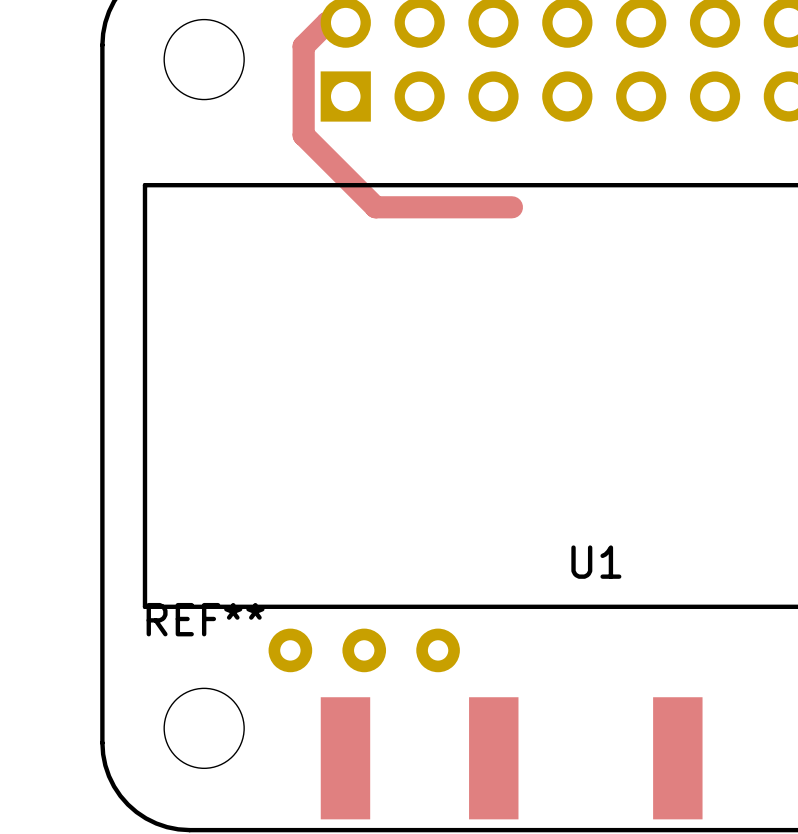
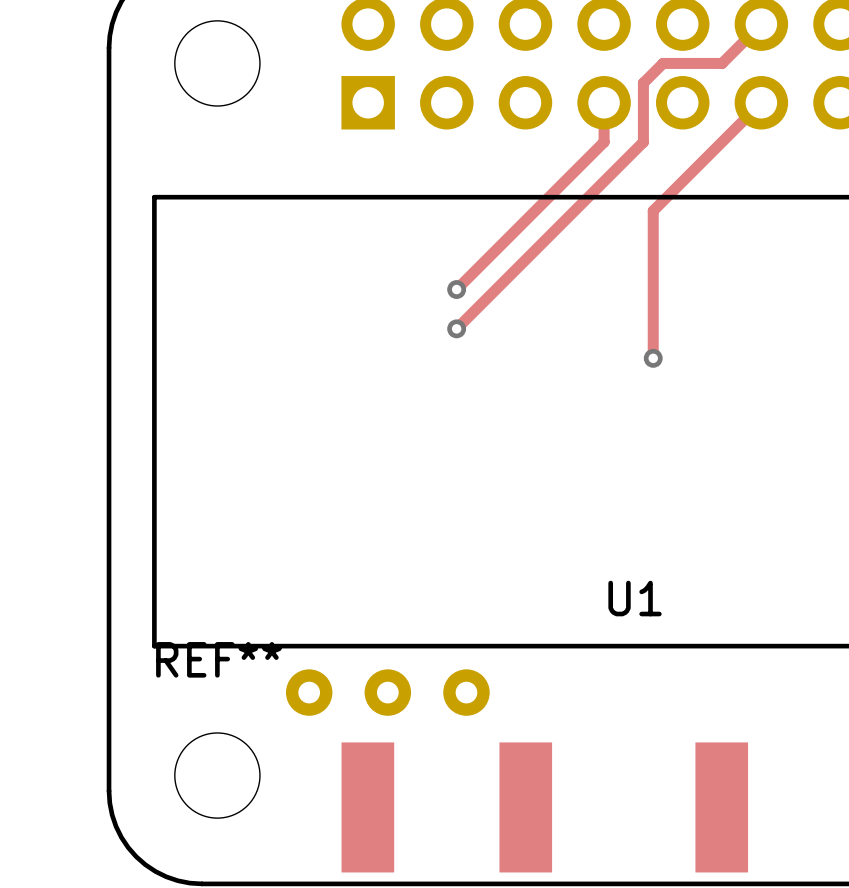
track: (345, 22) (327, 22) (303, 46) (303, 135) (375, 207) (511, 207) -> none
track: none -> (761, 24) (722, 63) (663, 63) (643, 83) (643, 142) (456, 328)
track: none -> (604, 102) (604, 142) (456, 289)
track: none -> (761, 102) (653, 210) (653, 358)
via: none -> (456, 289)
via: none -> (456, 328)
via: none -> (653, 358)

